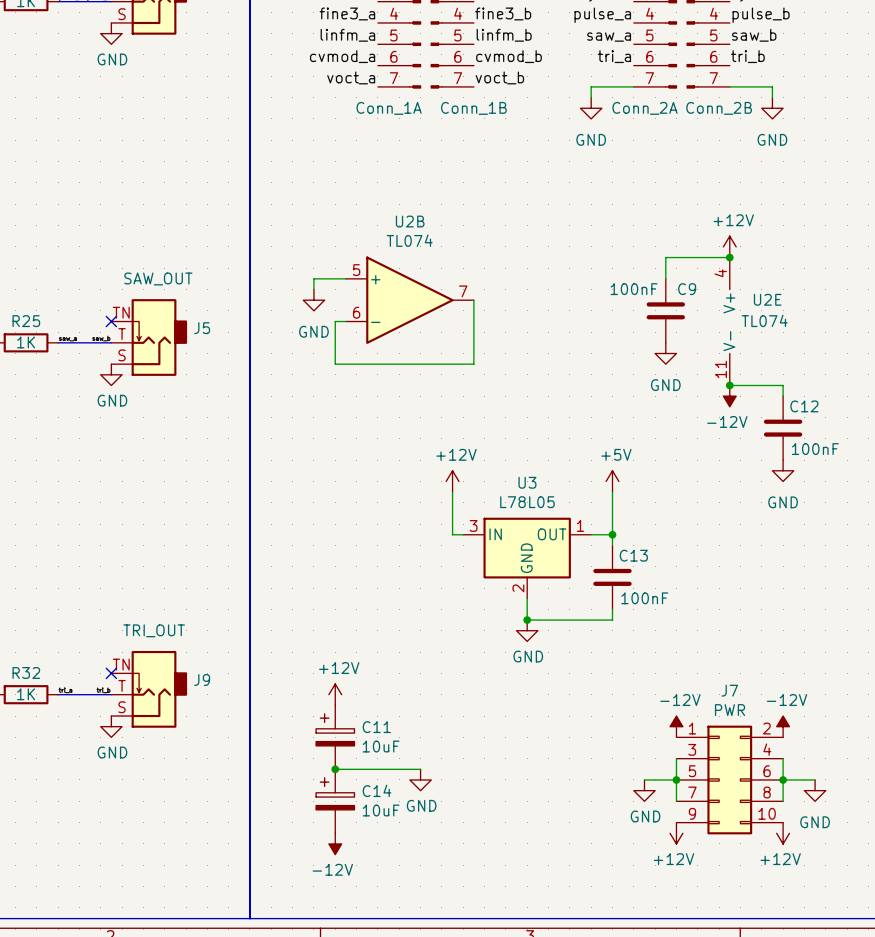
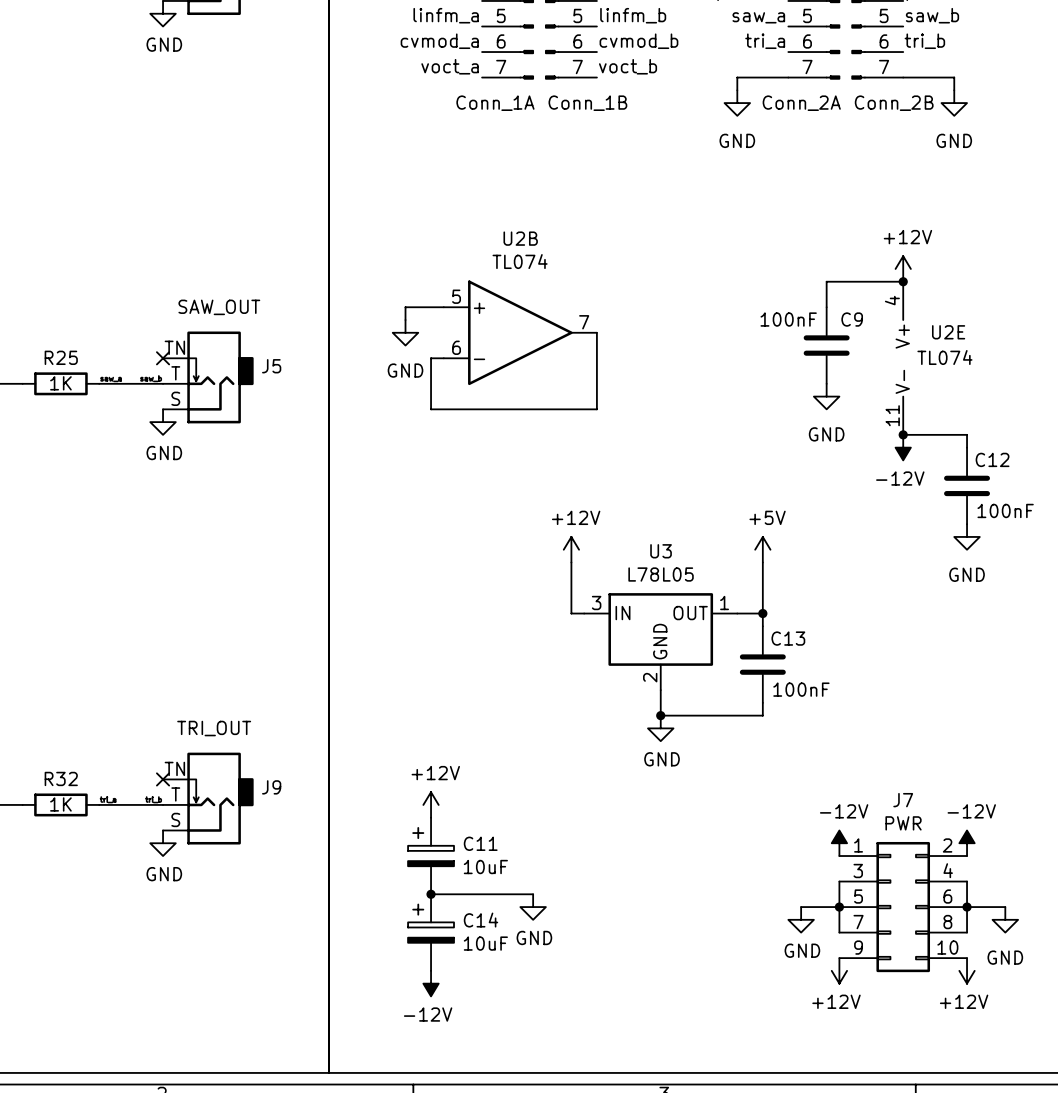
part value: Conn_1A (389, 108) -> Conn_1B (587, 103)
part value: Conn_1B (473, 108) -> Conn_1A (495, 103)
part value: Conn_2A (644, 108) -> Conn_2B (894, 103)
part value: Conn_2B (719, 108) -> Conn_2A (801, 103)

